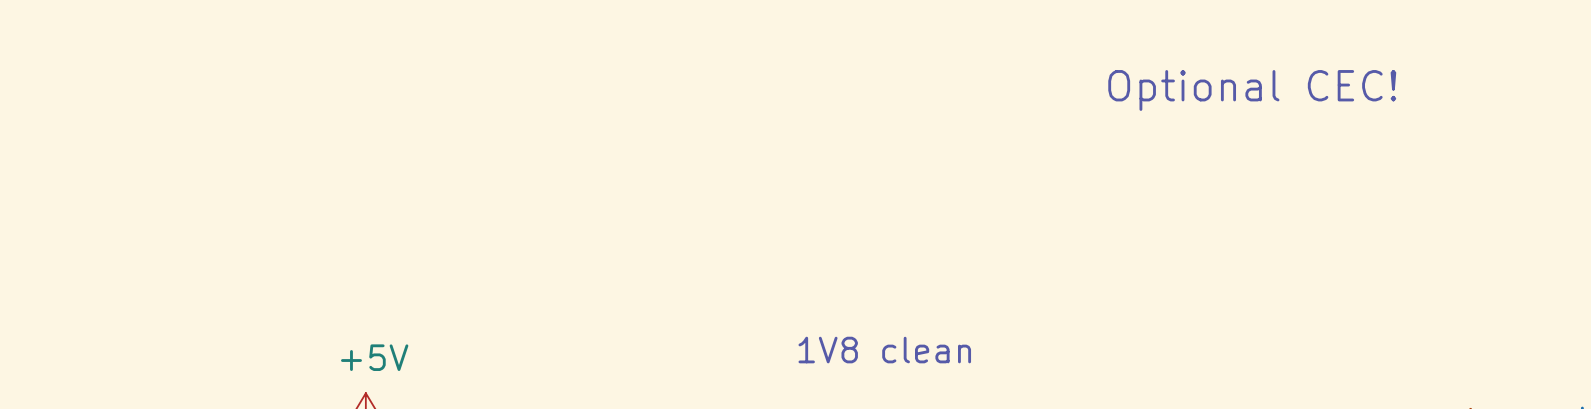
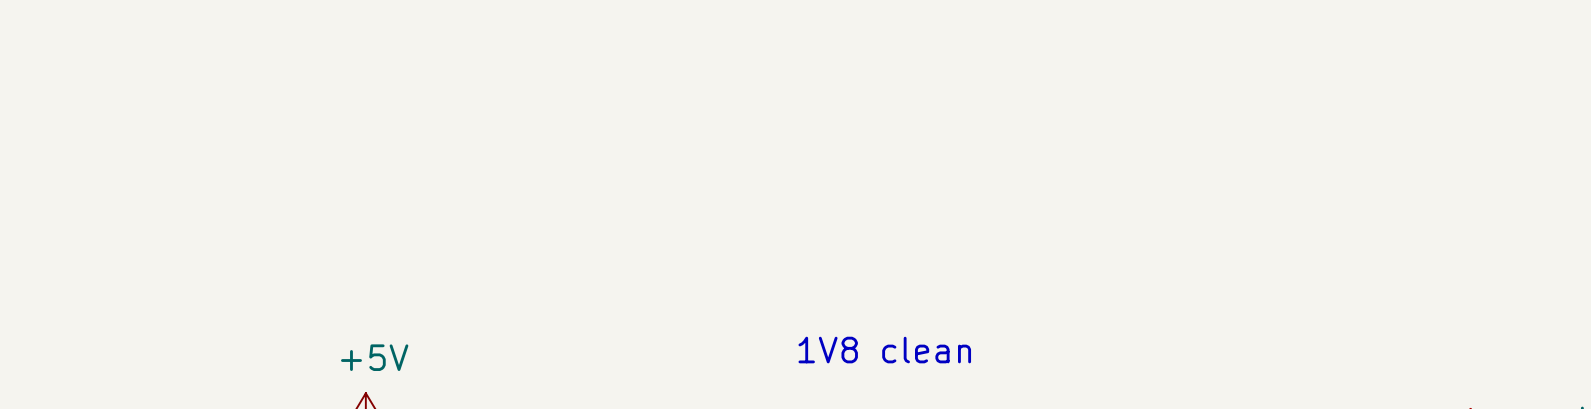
text: Optional CEC! (1252, 90) -> none

